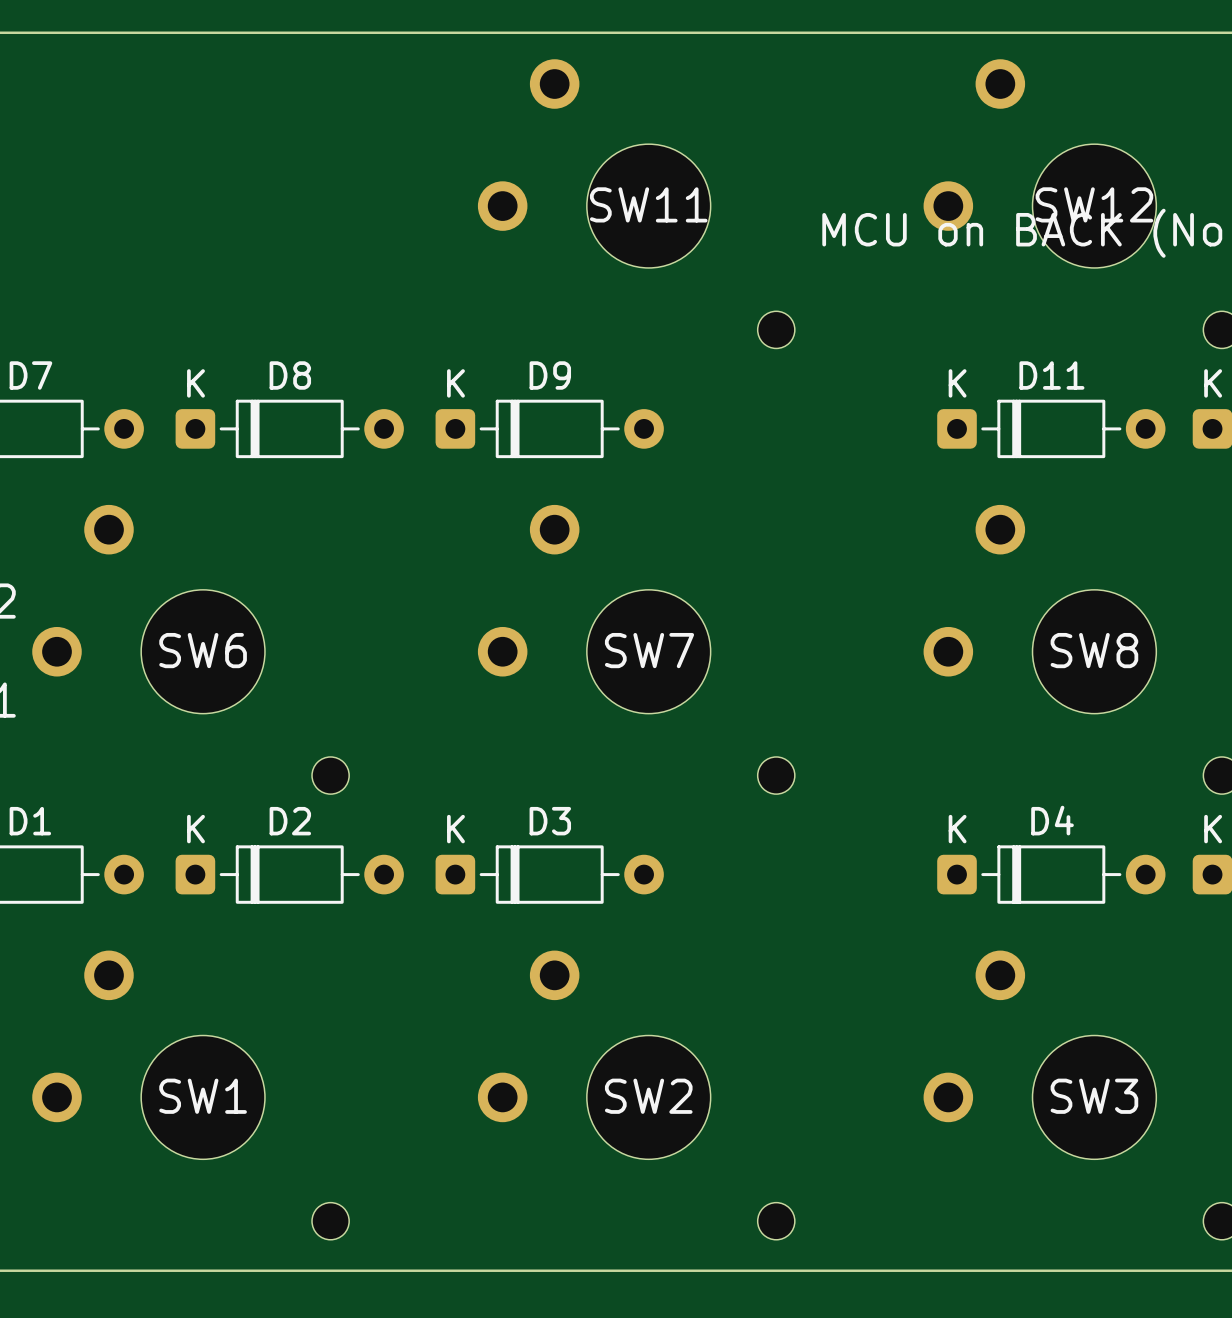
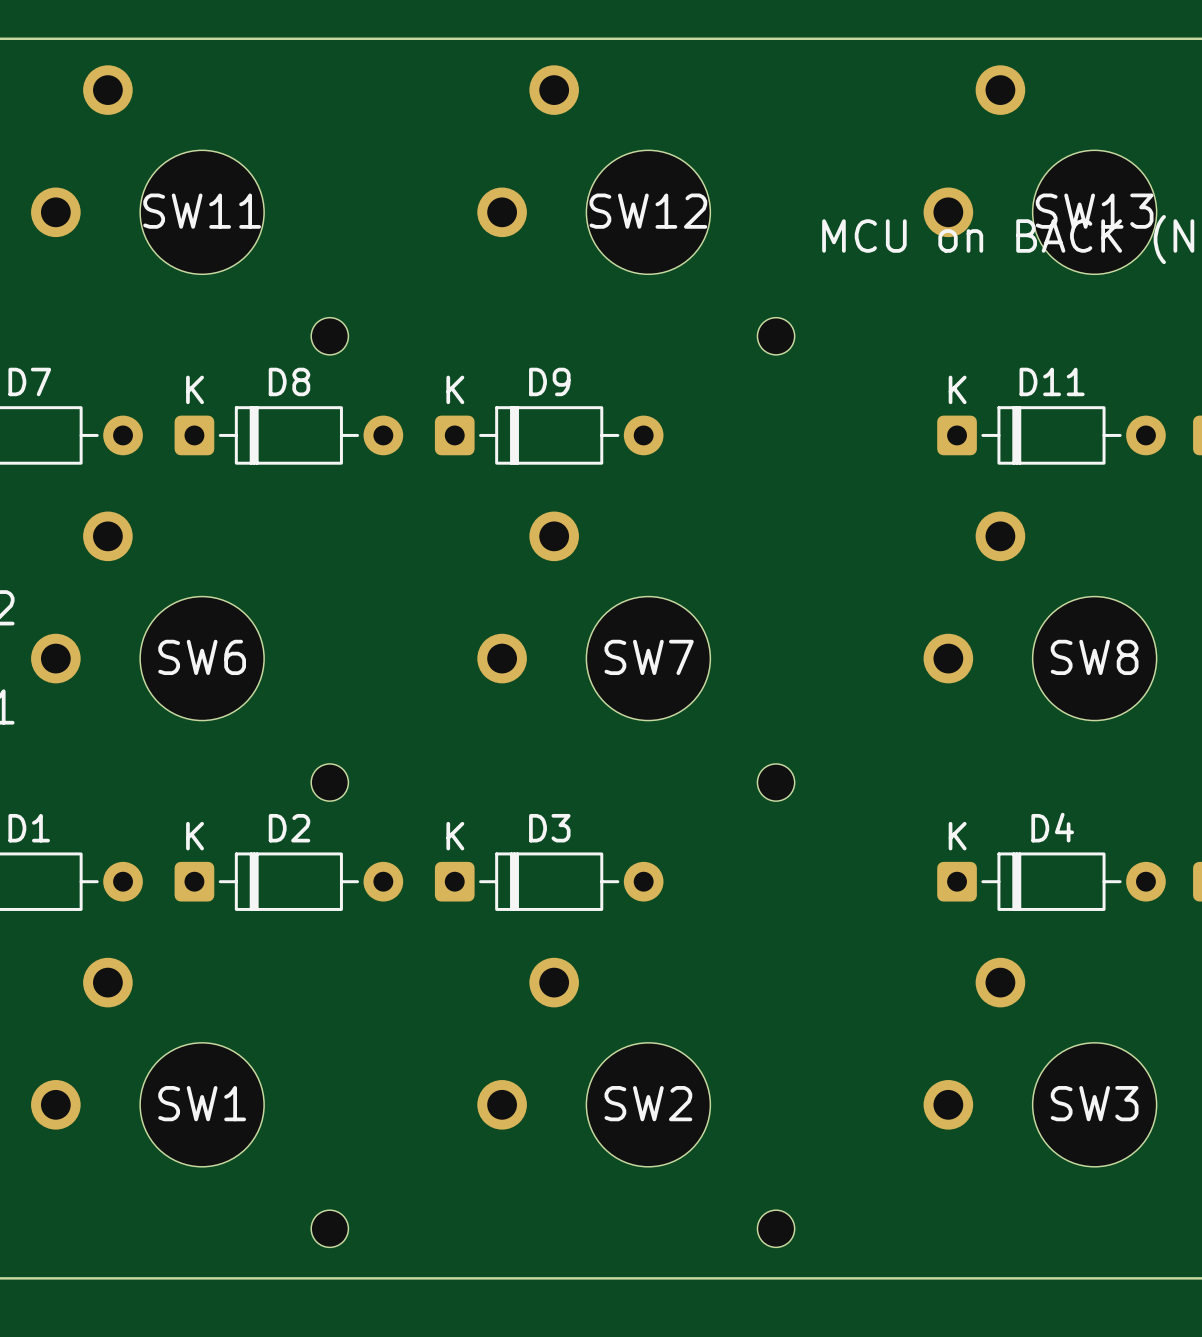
SW11: none -> (189, 210)
SW11 name: SW11 (648, 204) -> SW12 (648, 211)
SW12 name: SW12 (1094, 204) -> SW13 (1094, 211)

